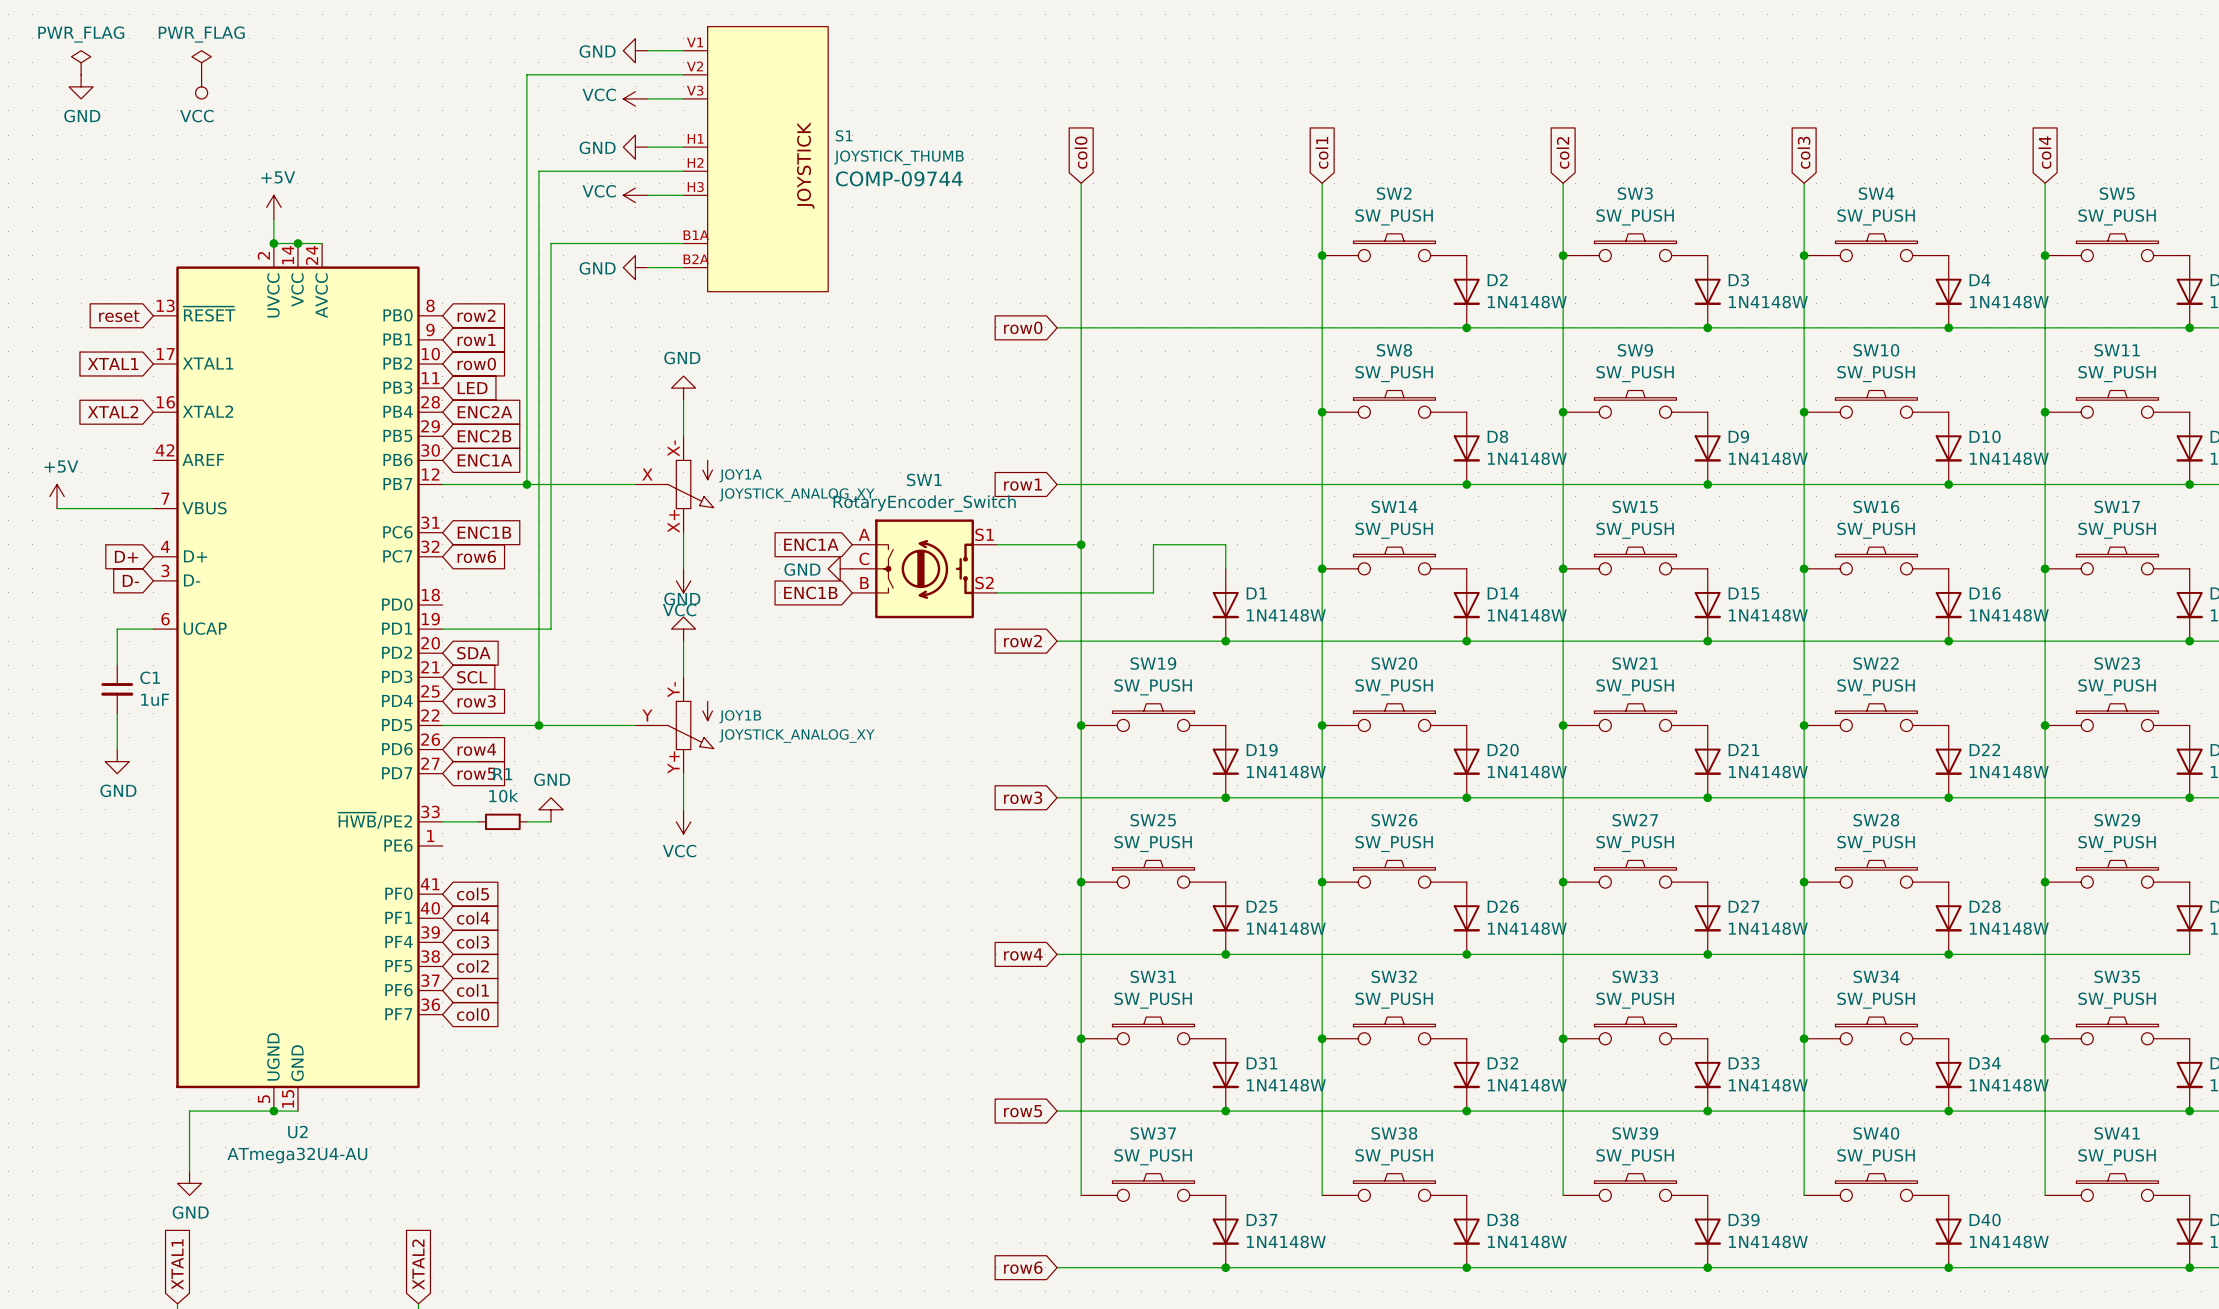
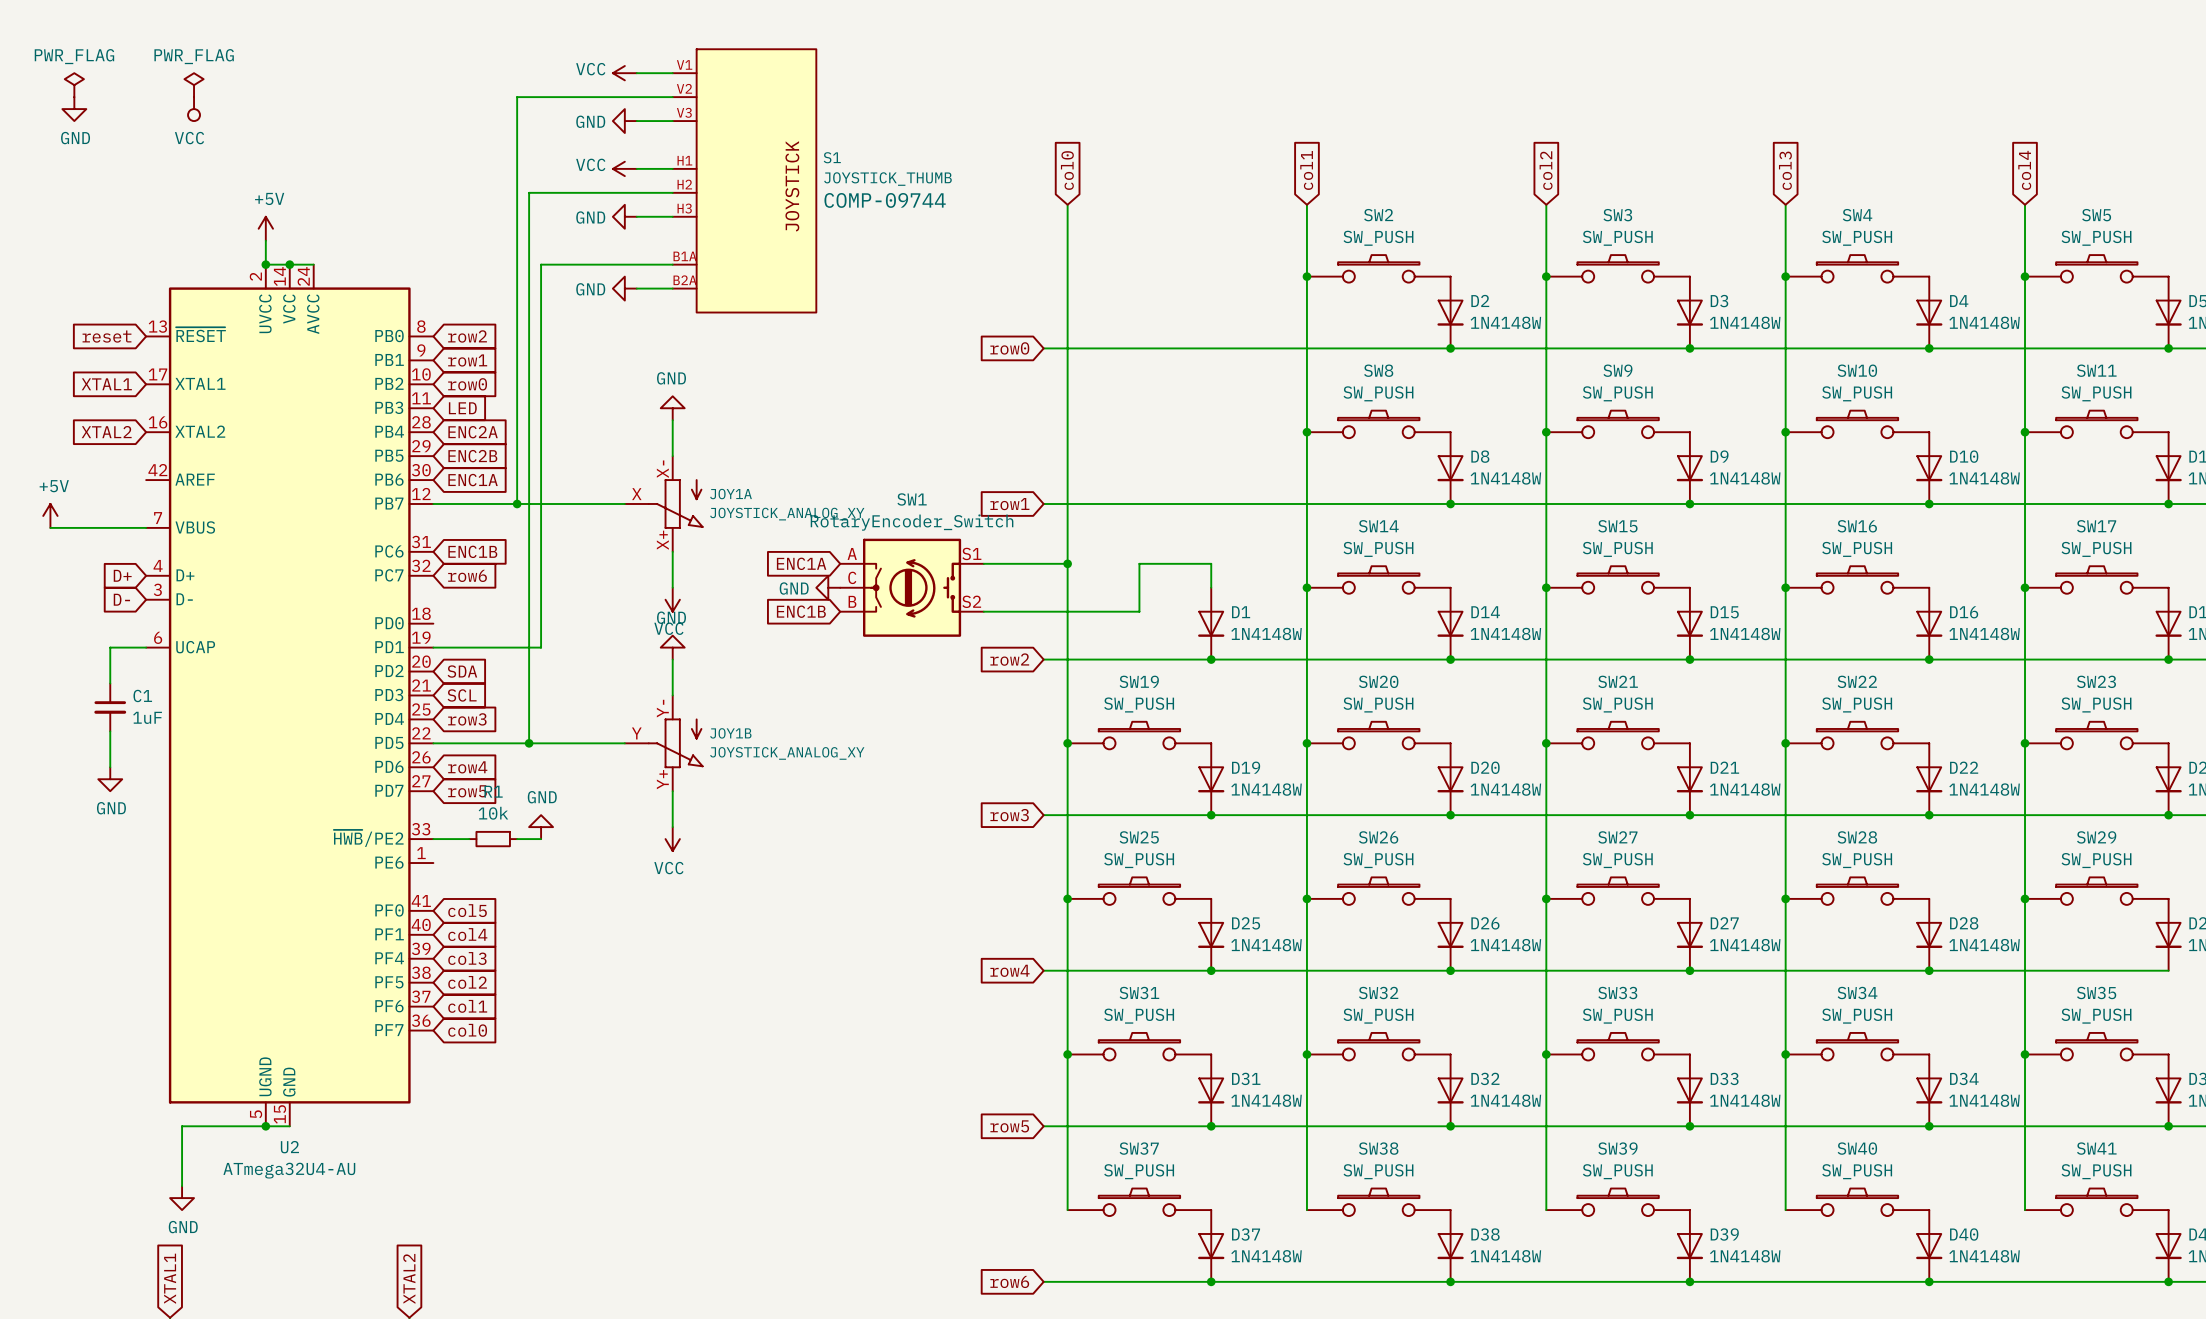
power symbol: GND (635, 50) -> VCC (624, 73)
power symbol: VCC (635, 98) -> GND (624, 121)
power symbol: GND (635, 147) -> VCC (624, 168)
power symbol: VCC (635, 195) -> GND (624, 216)

